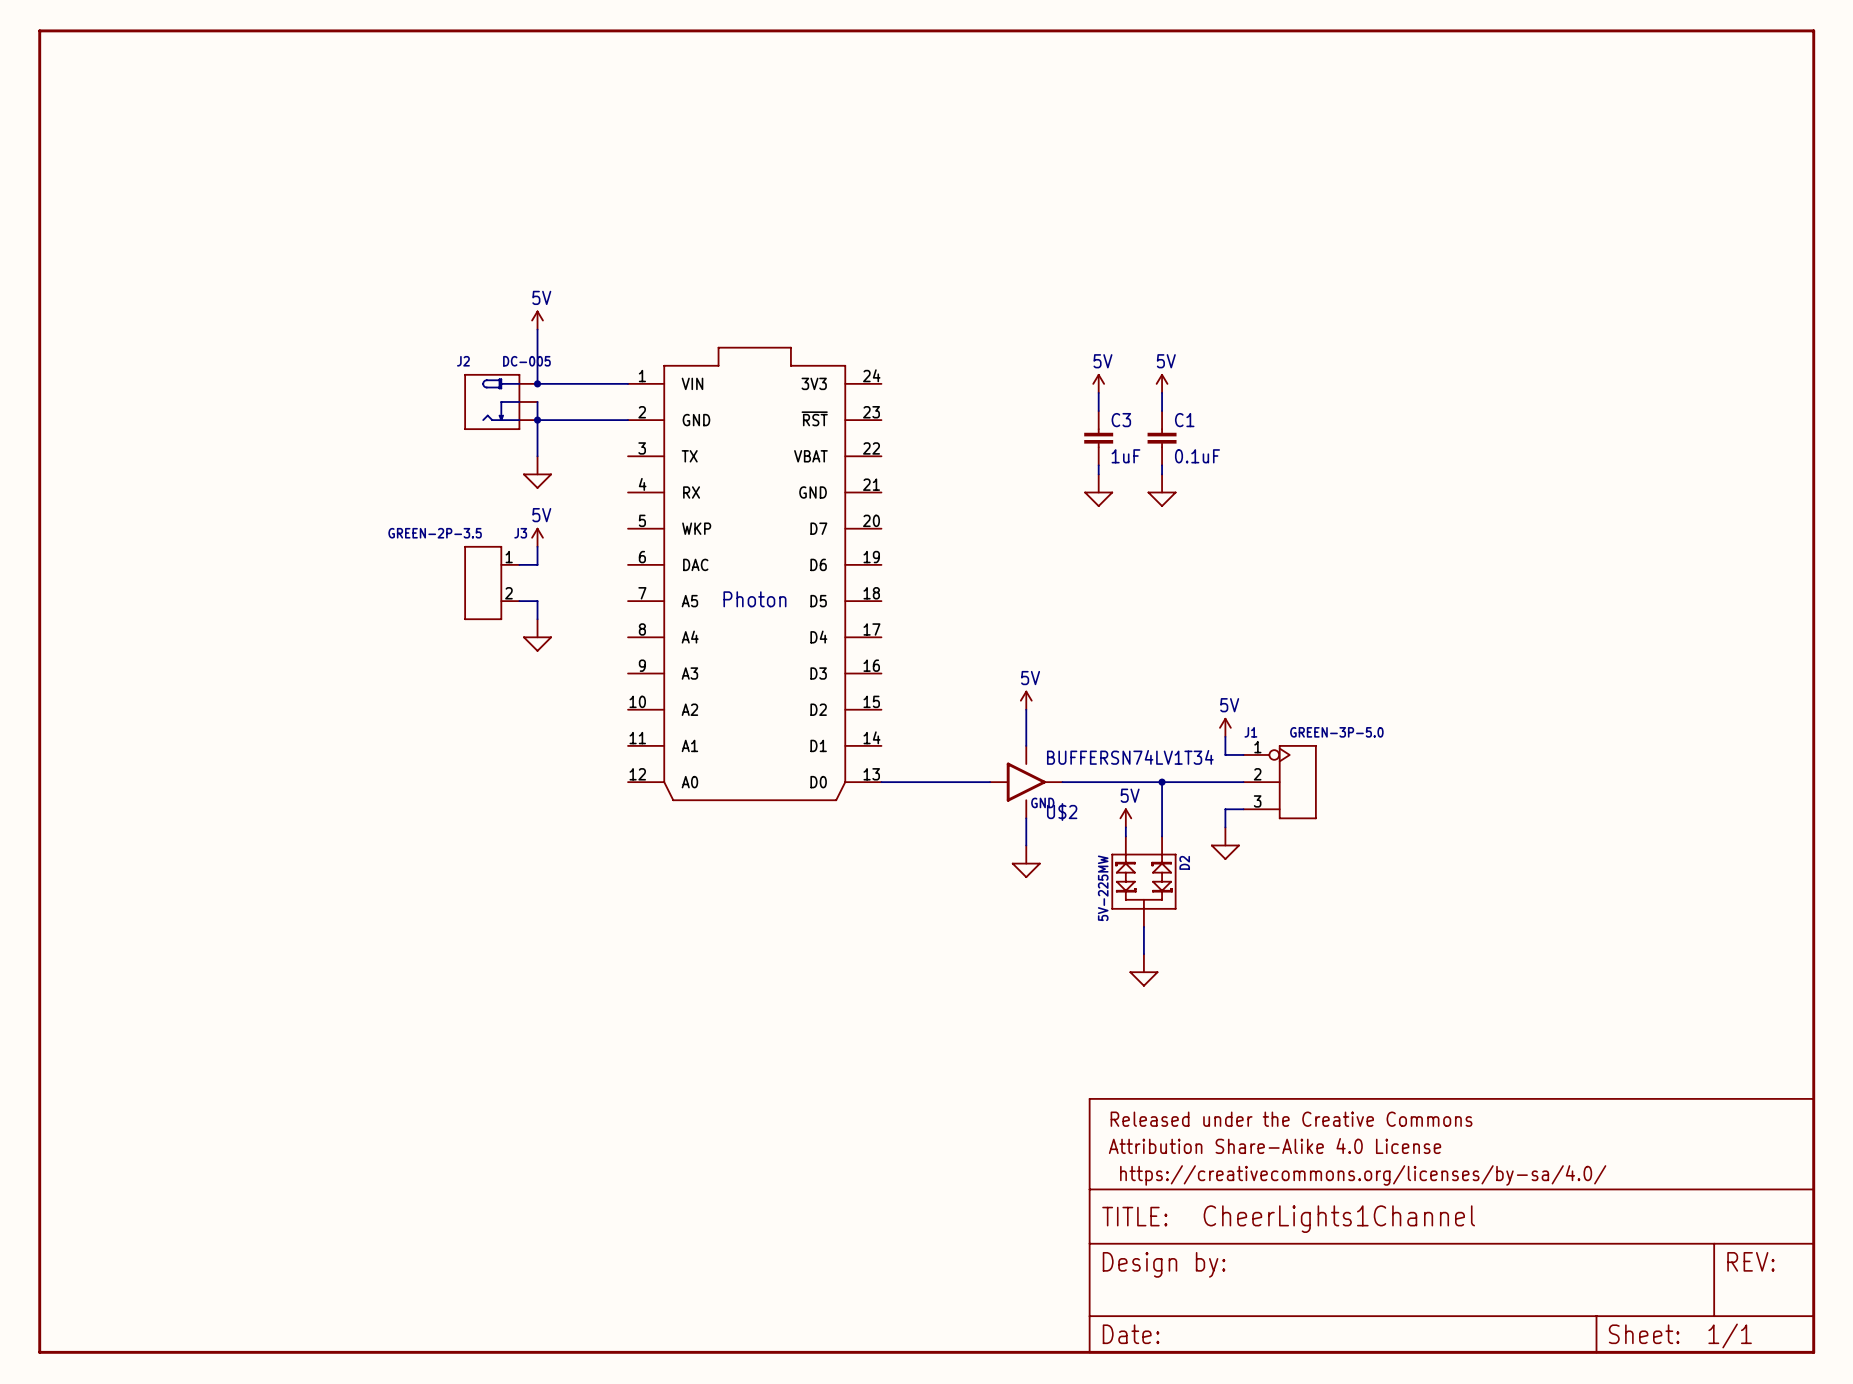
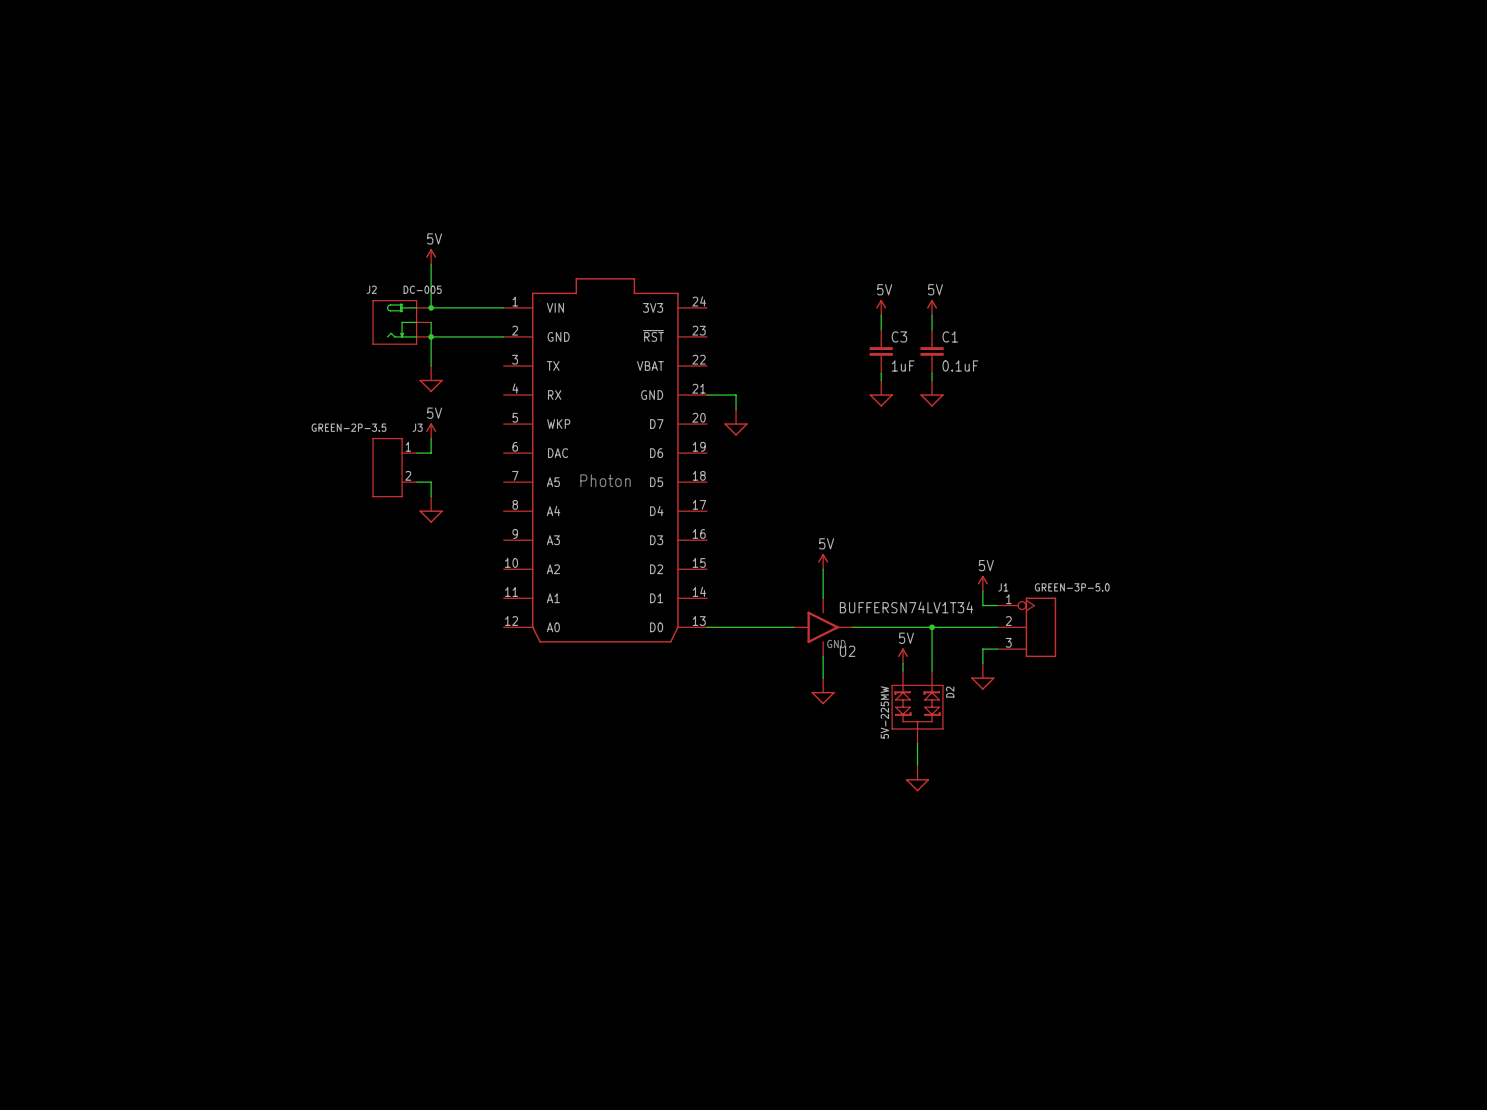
wire: none -> (707, 395) (736, 395) (736, 409)
power symbol: none -> (736, 422)
part: (926, 691) -> none
U$2 name: U$2 (1062, 812) -> U2 (847, 651)
part: (1451, 1225) -> none

